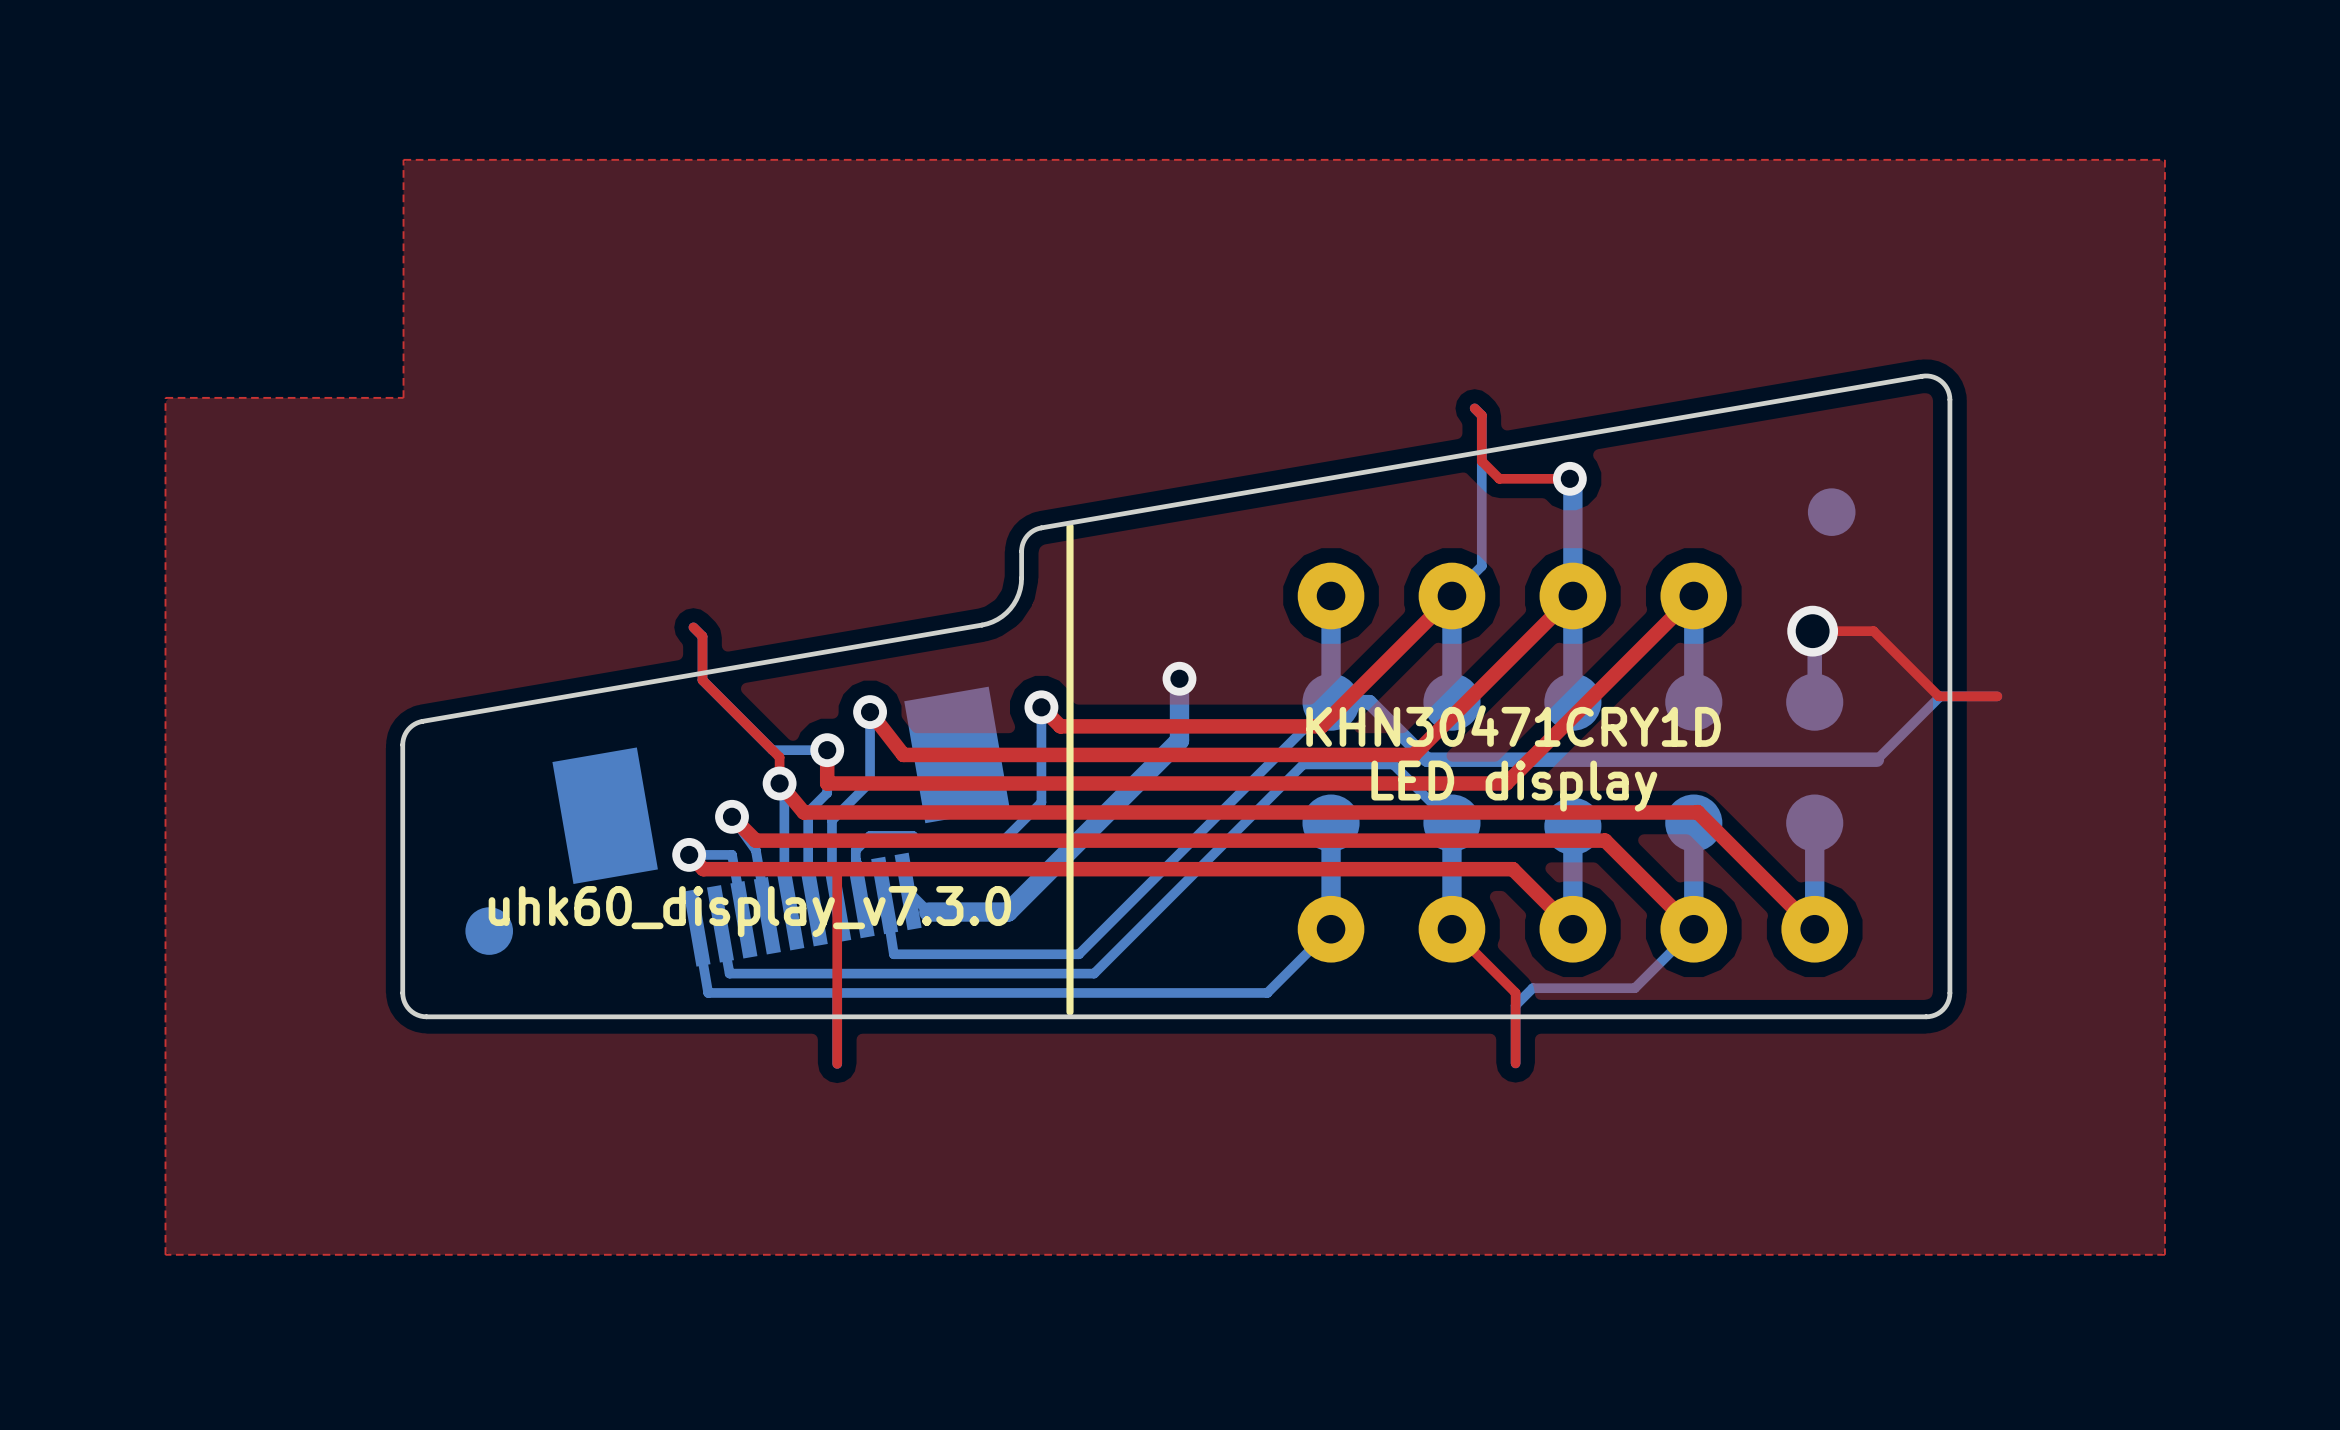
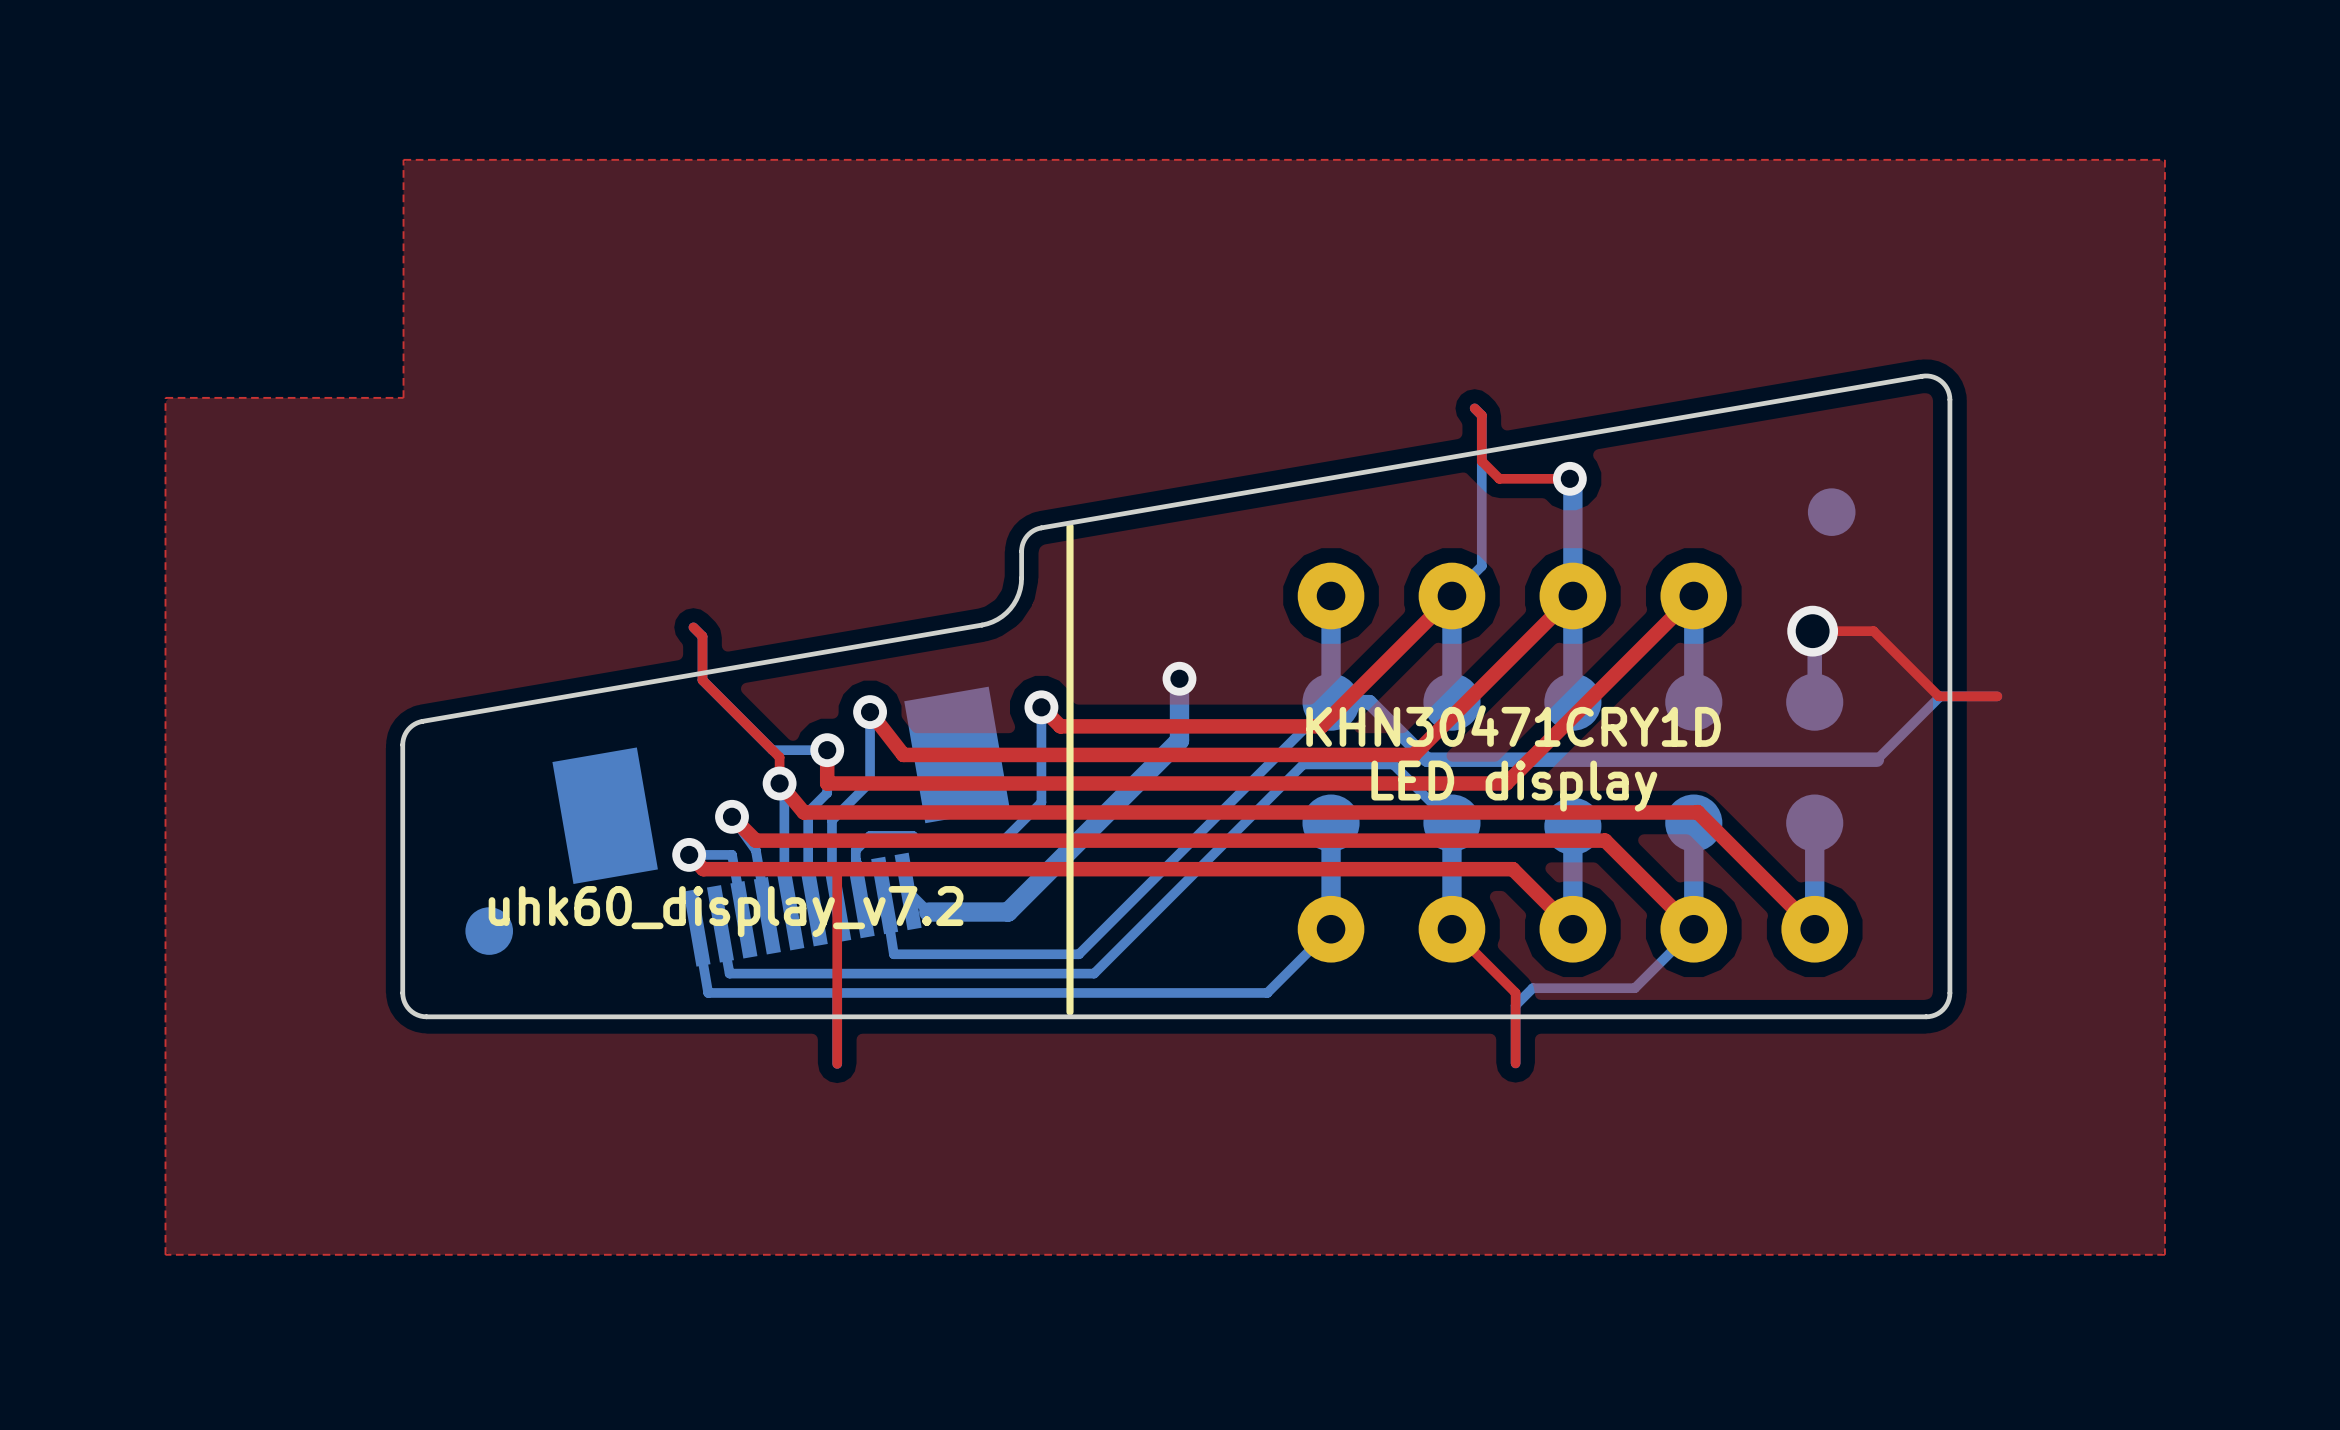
text: uhk60_display_v7.3.0 (749, 911) -> uhk60_display_v7.2 (726, 911)

